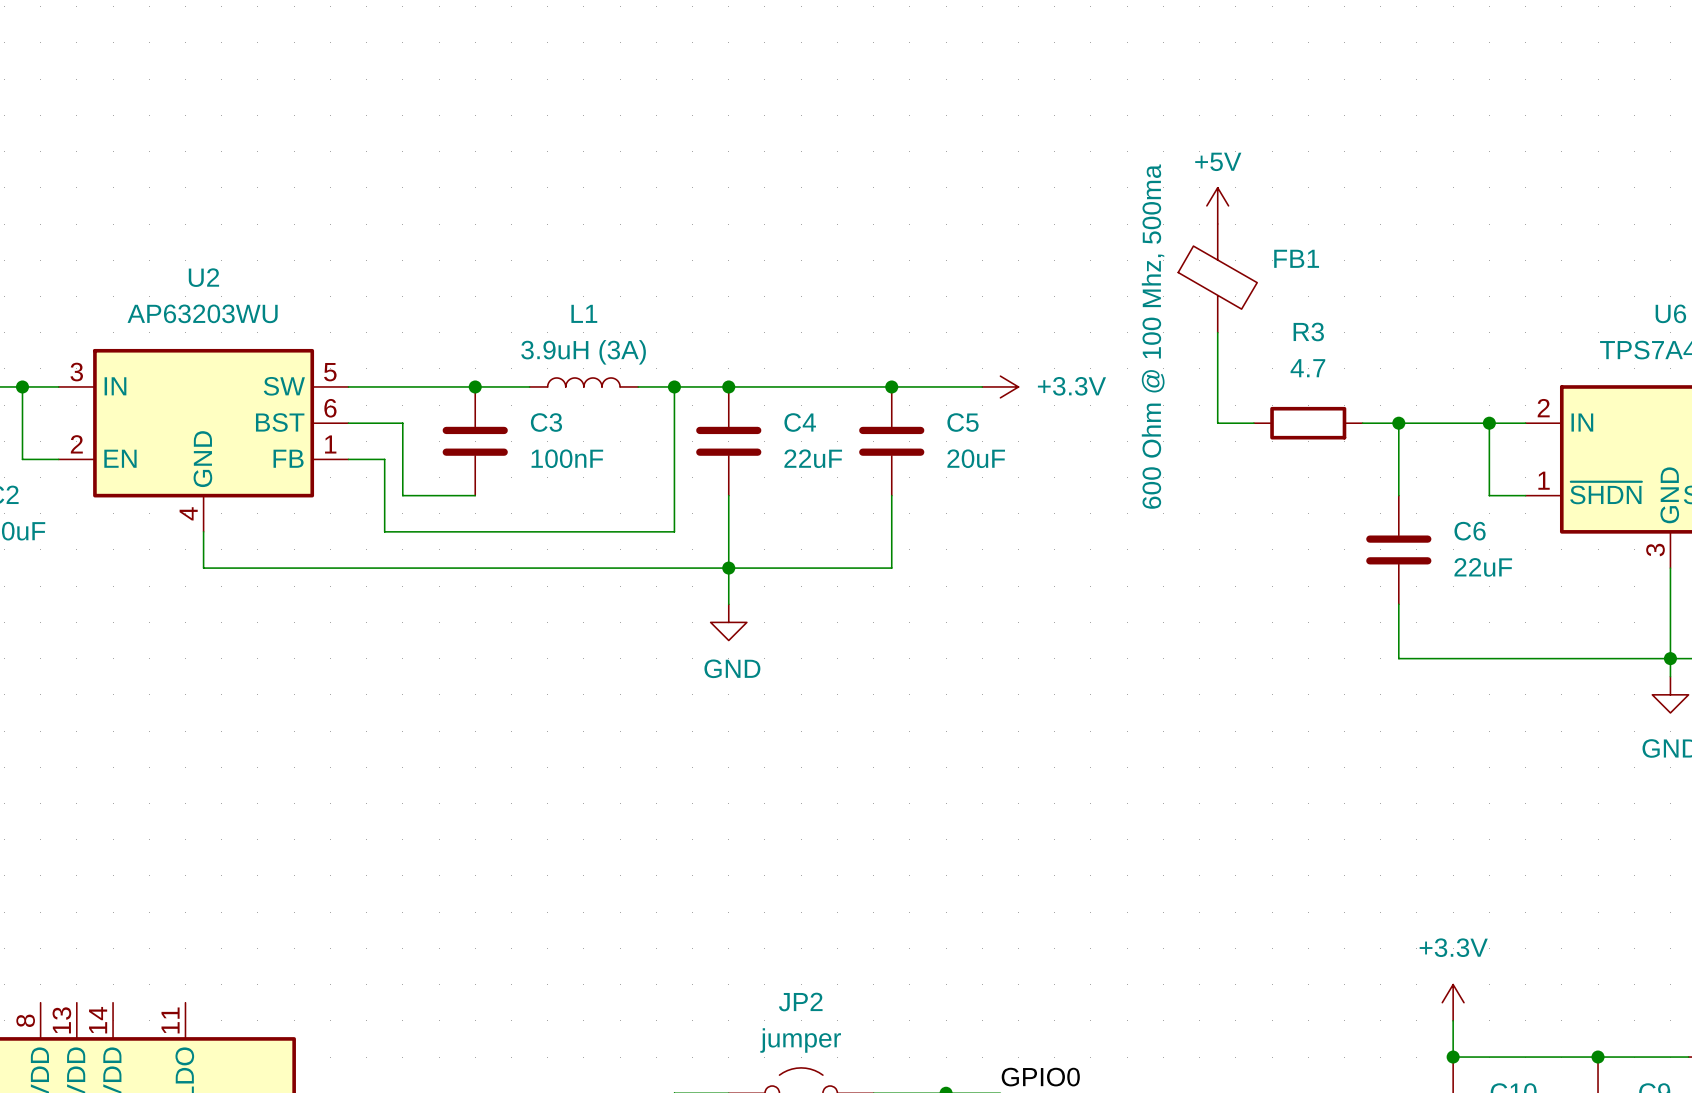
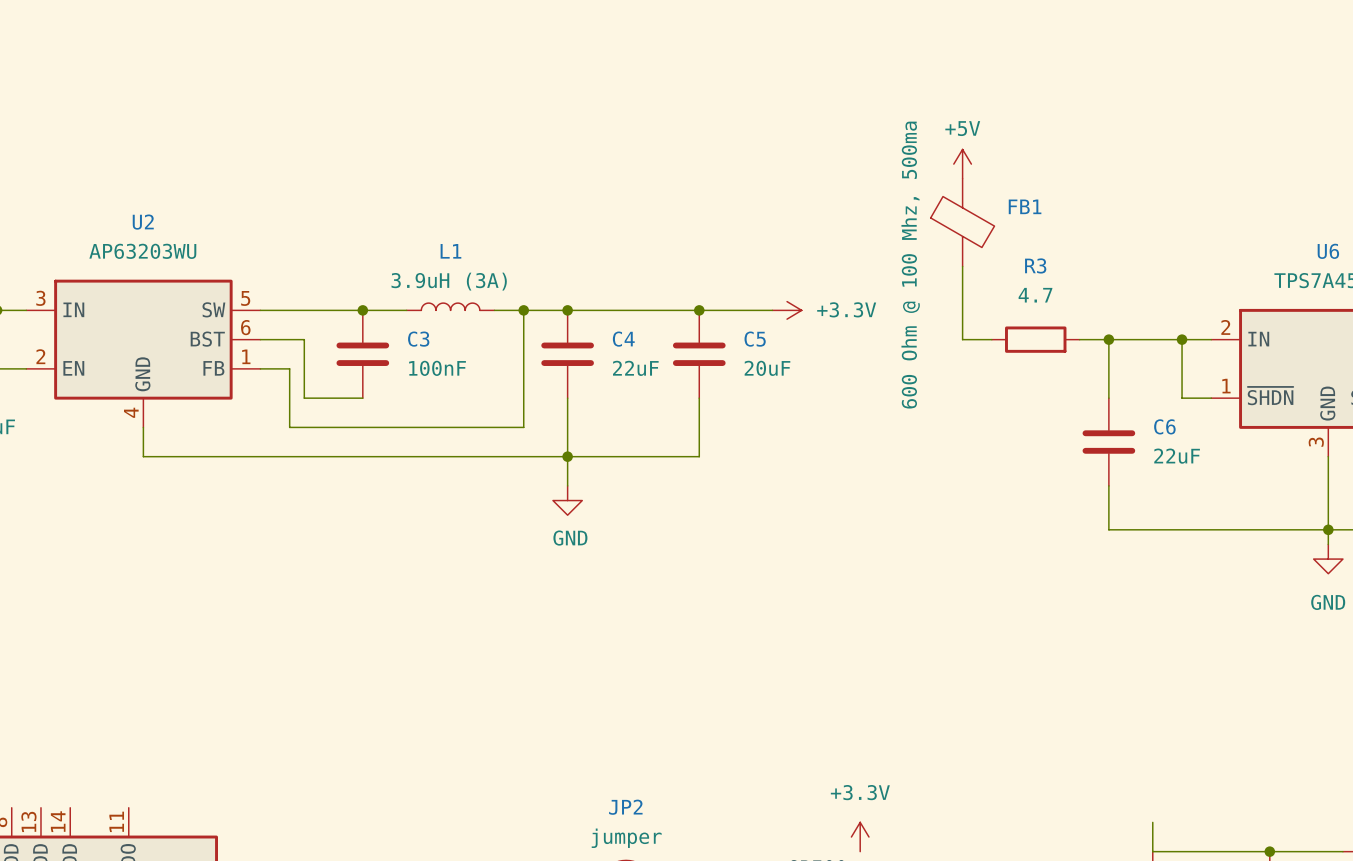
power symbol: +3.3V (1453, 1002) -> none
power symbol: none -> +3.3V (860, 837)
junction: (1453, 1057) -> none

